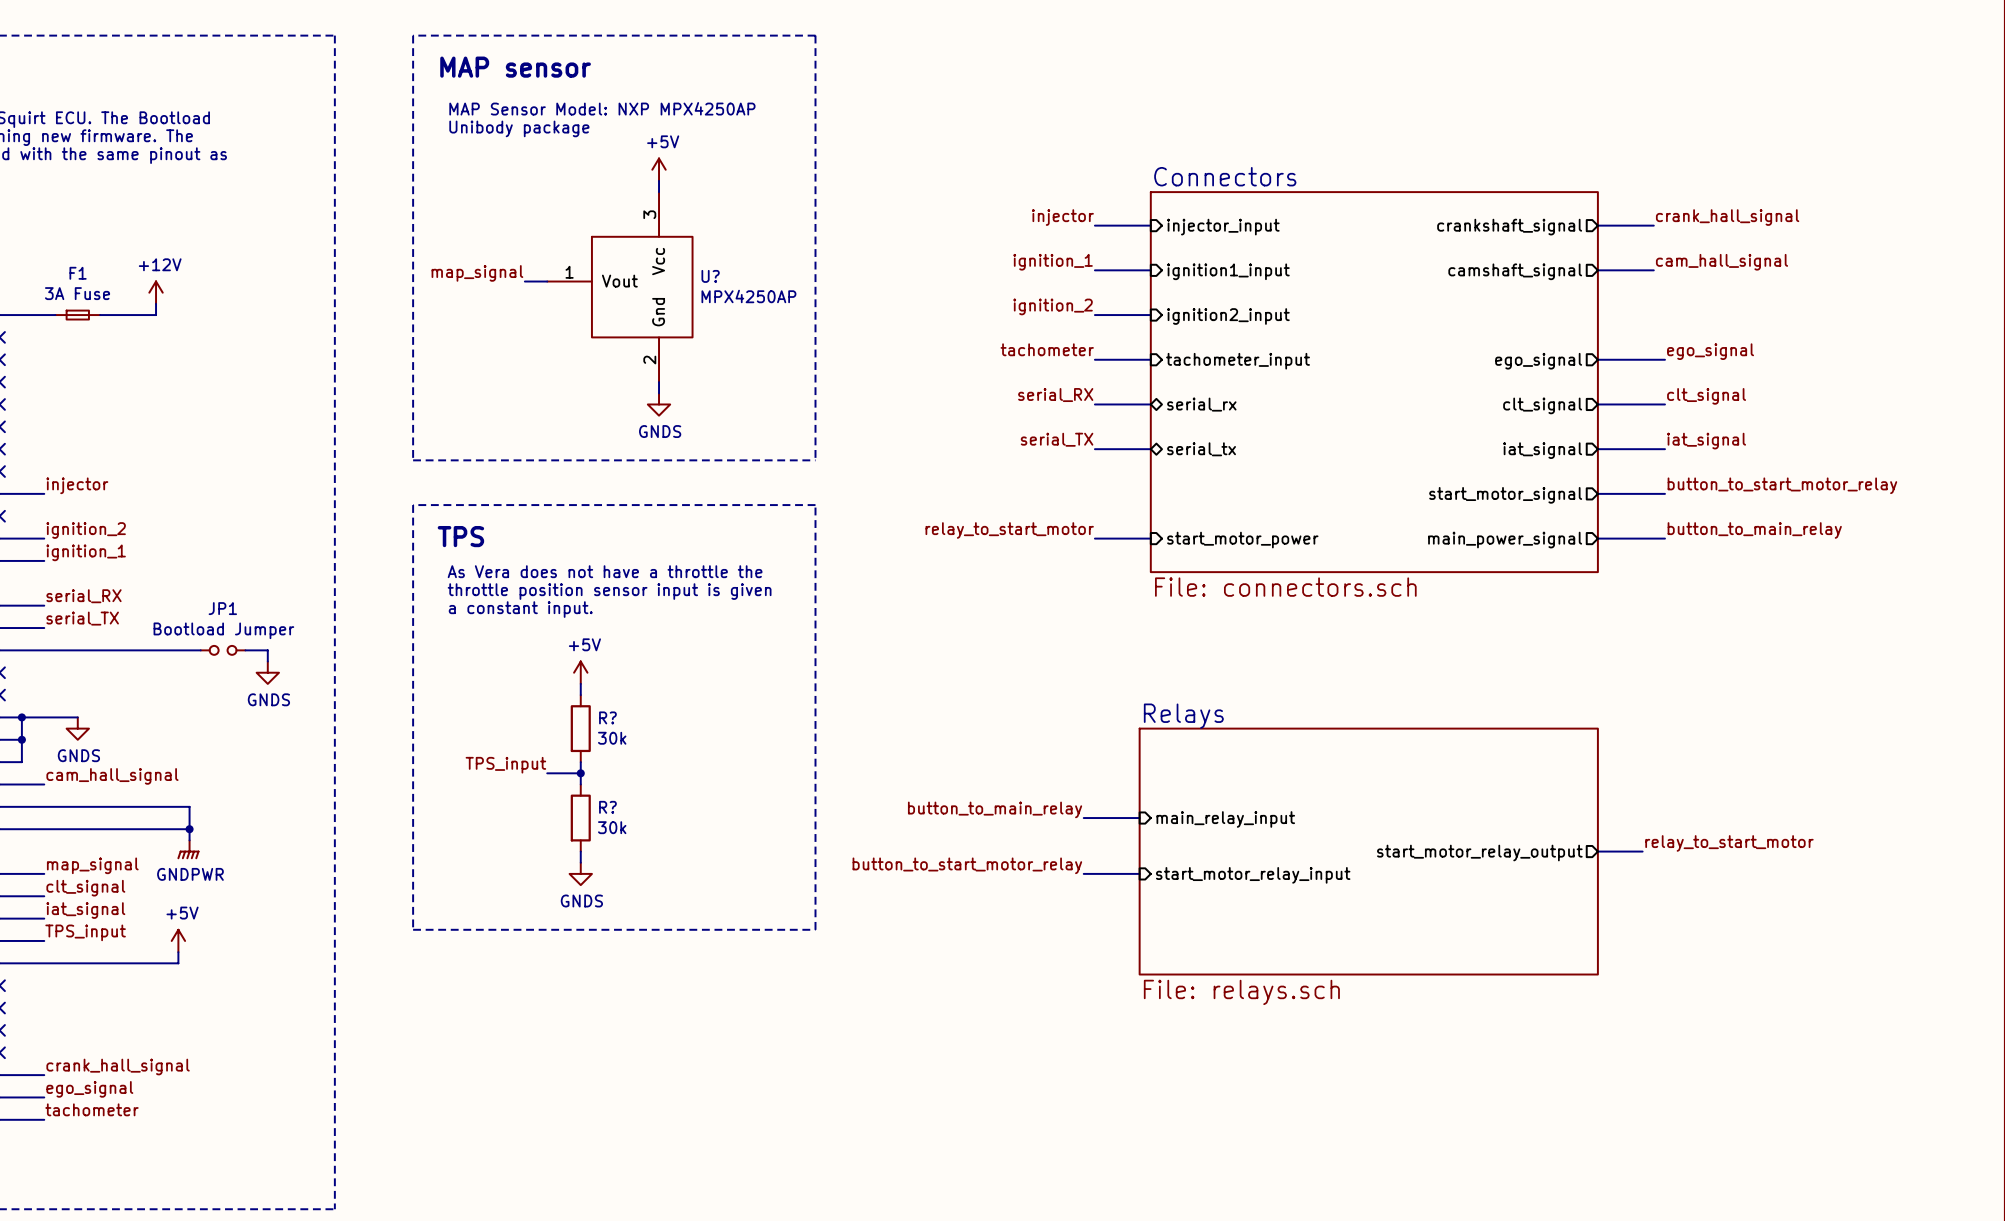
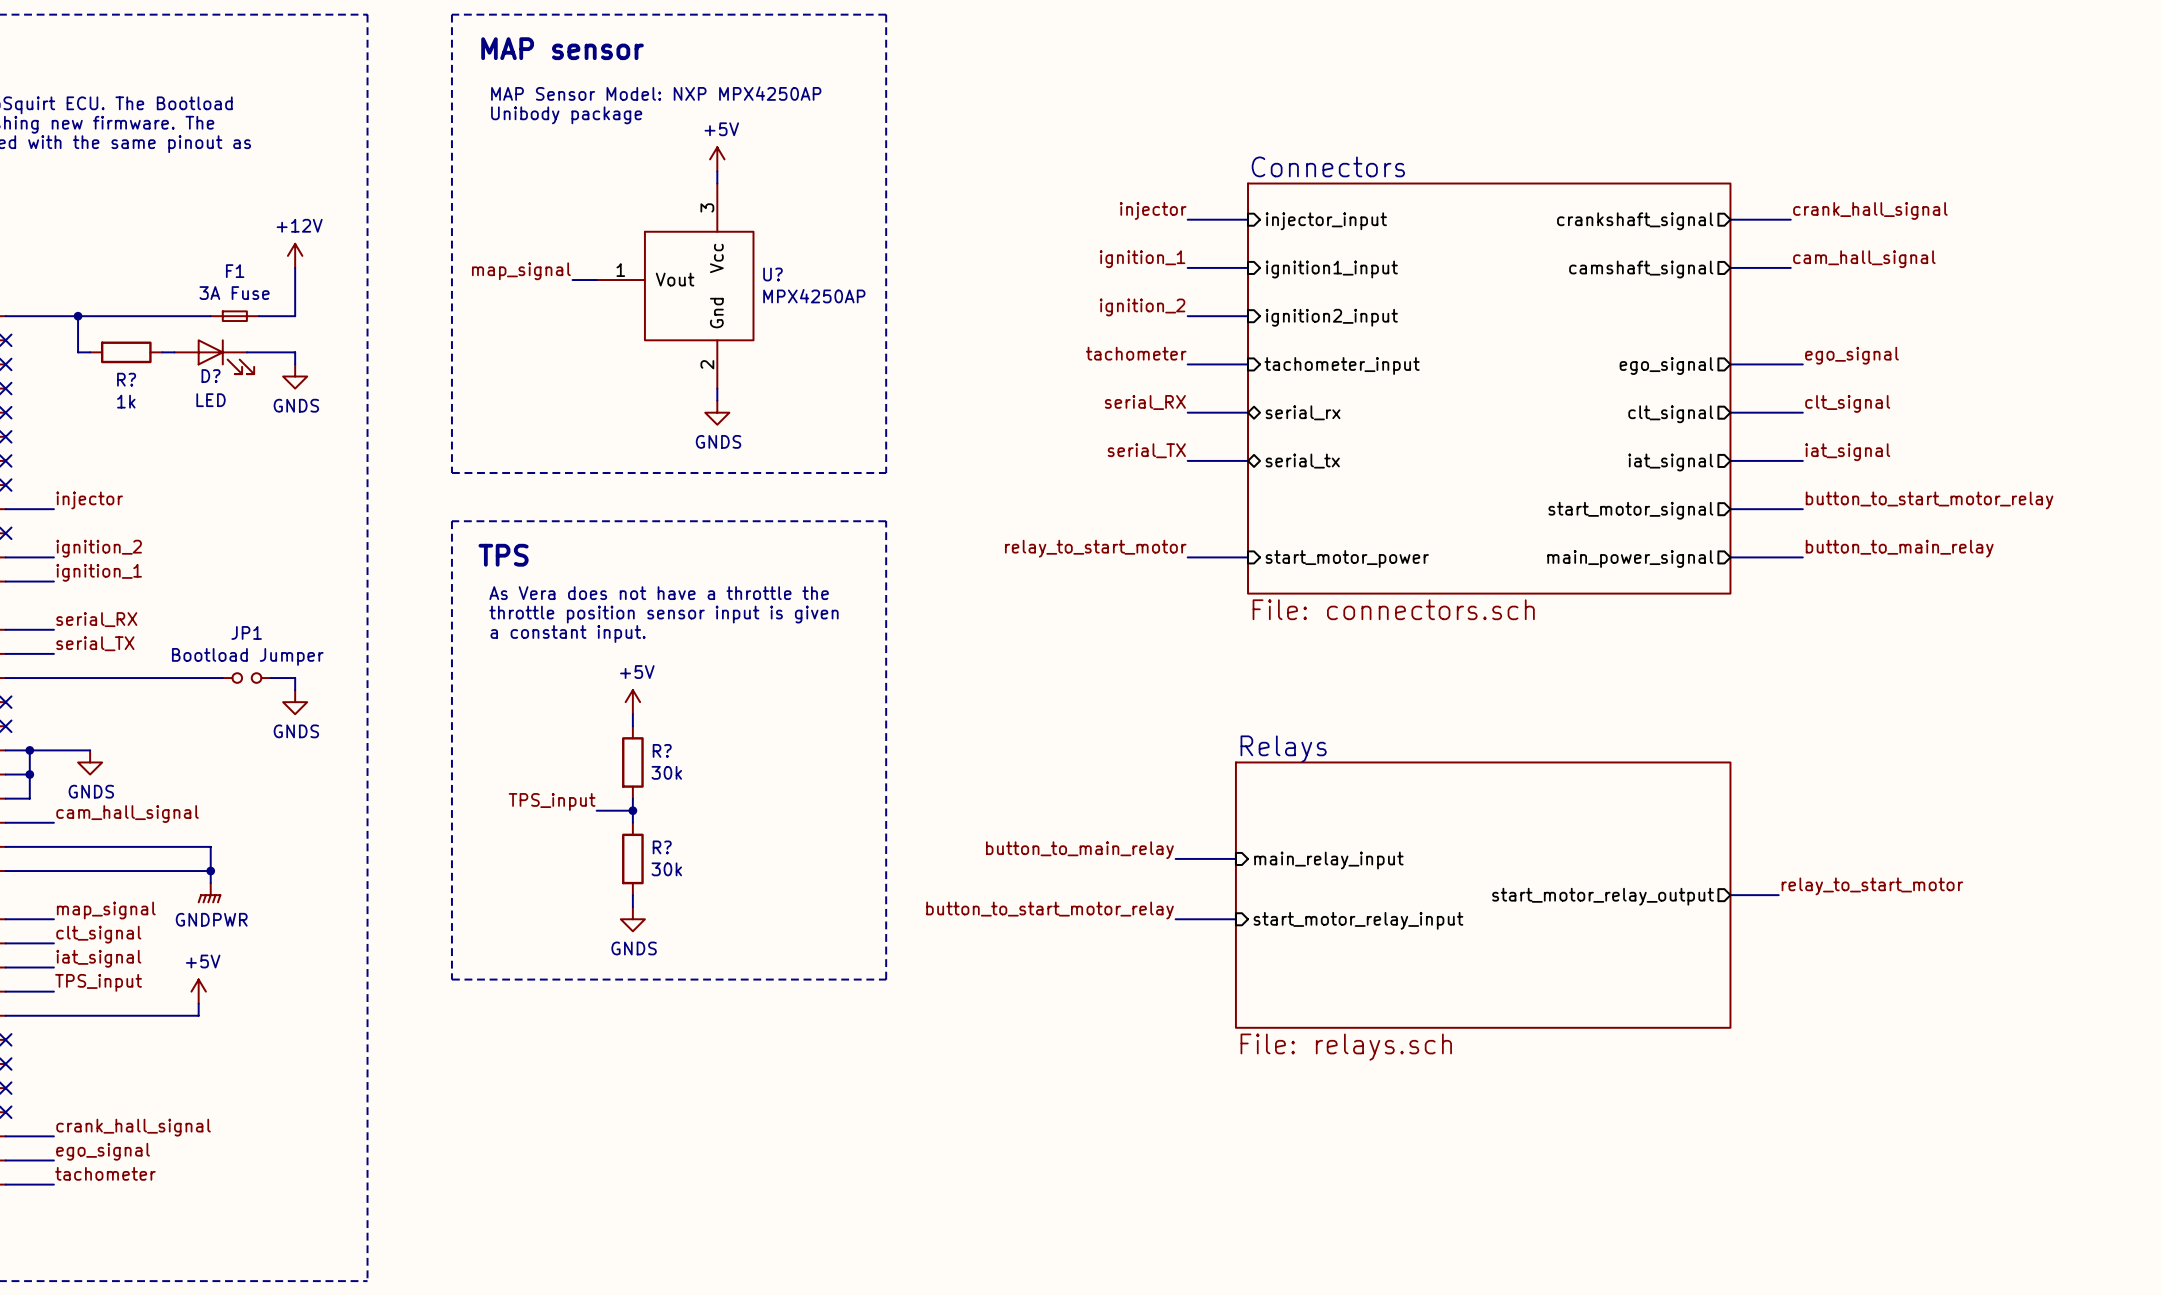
wire: none -> (295, 267) (295, 316) (258, 316)
power symbol position: +12V (156, 292) -> +12V (295, 255)
wire: (156, 303) (156, 315) -> (210, 316) (174, 316)
wire: none -> (78, 316) (78, 352) (90, 352)
junction: none -> (78, 316)
F1 position: (77, 315) -> (234, 316)
R?: none -> 1k (126, 352)
wire: none -> (162, 352) (174, 352)
wire: none -> (246, 352) (295, 352) (295, 364)
D?: none -> LED (214, 356)
power symbol: none -> GNDS (295, 376)

